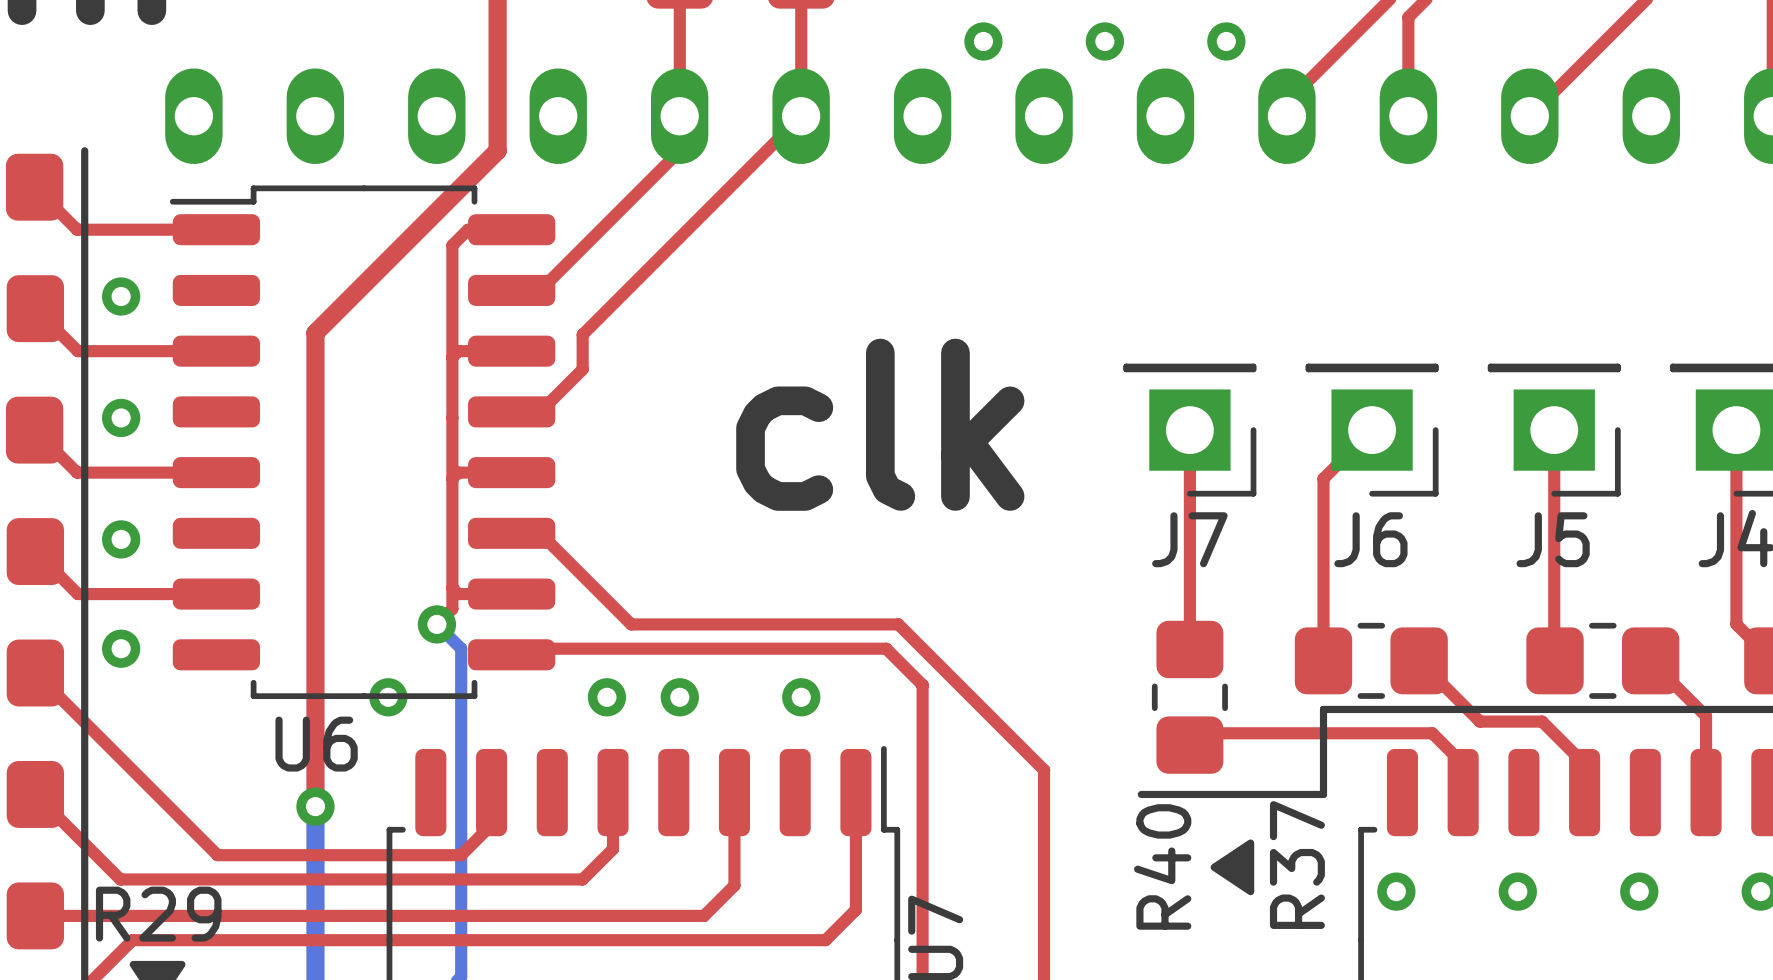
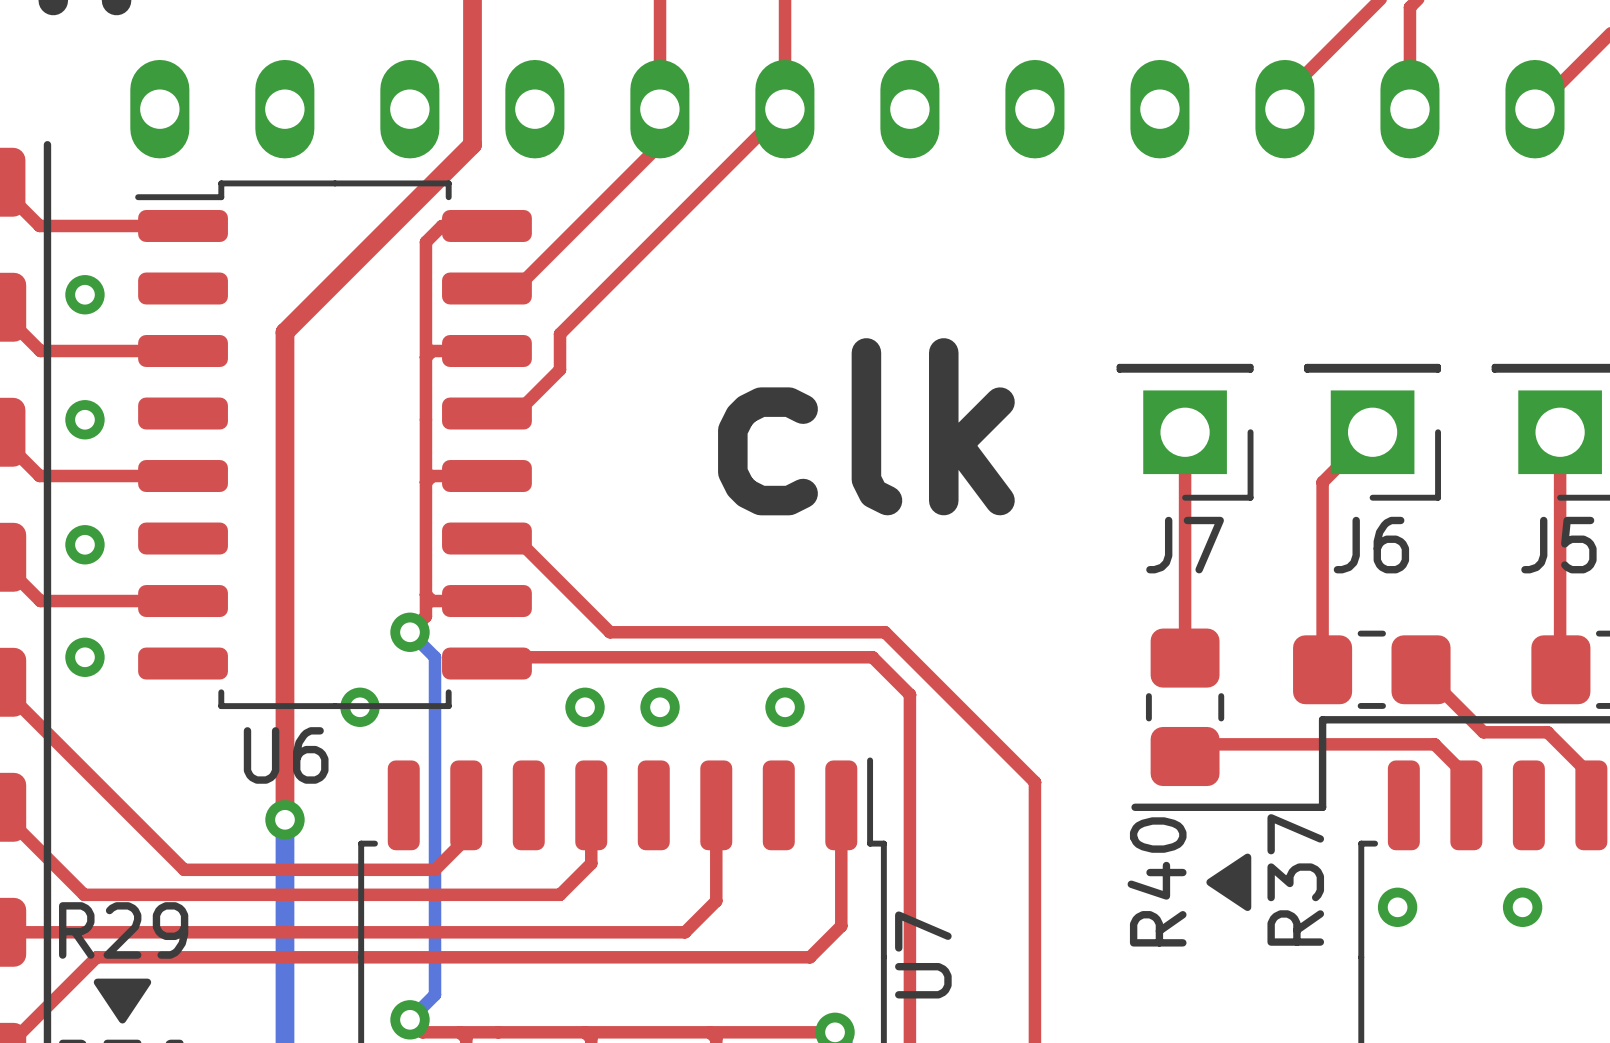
via: (983, 41) -> none
via: (1104, 41) -> none
via: (1226, 41) -> none

